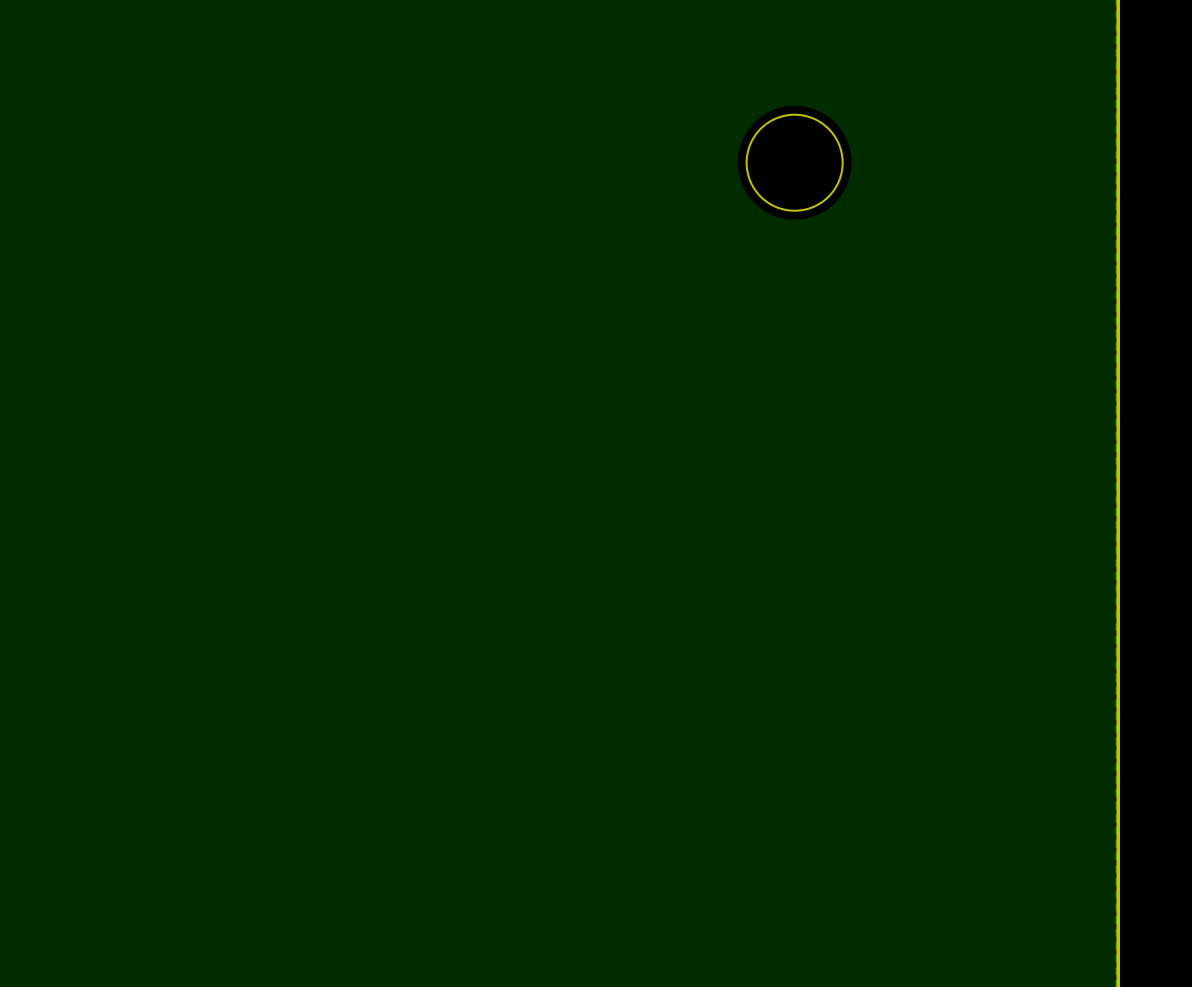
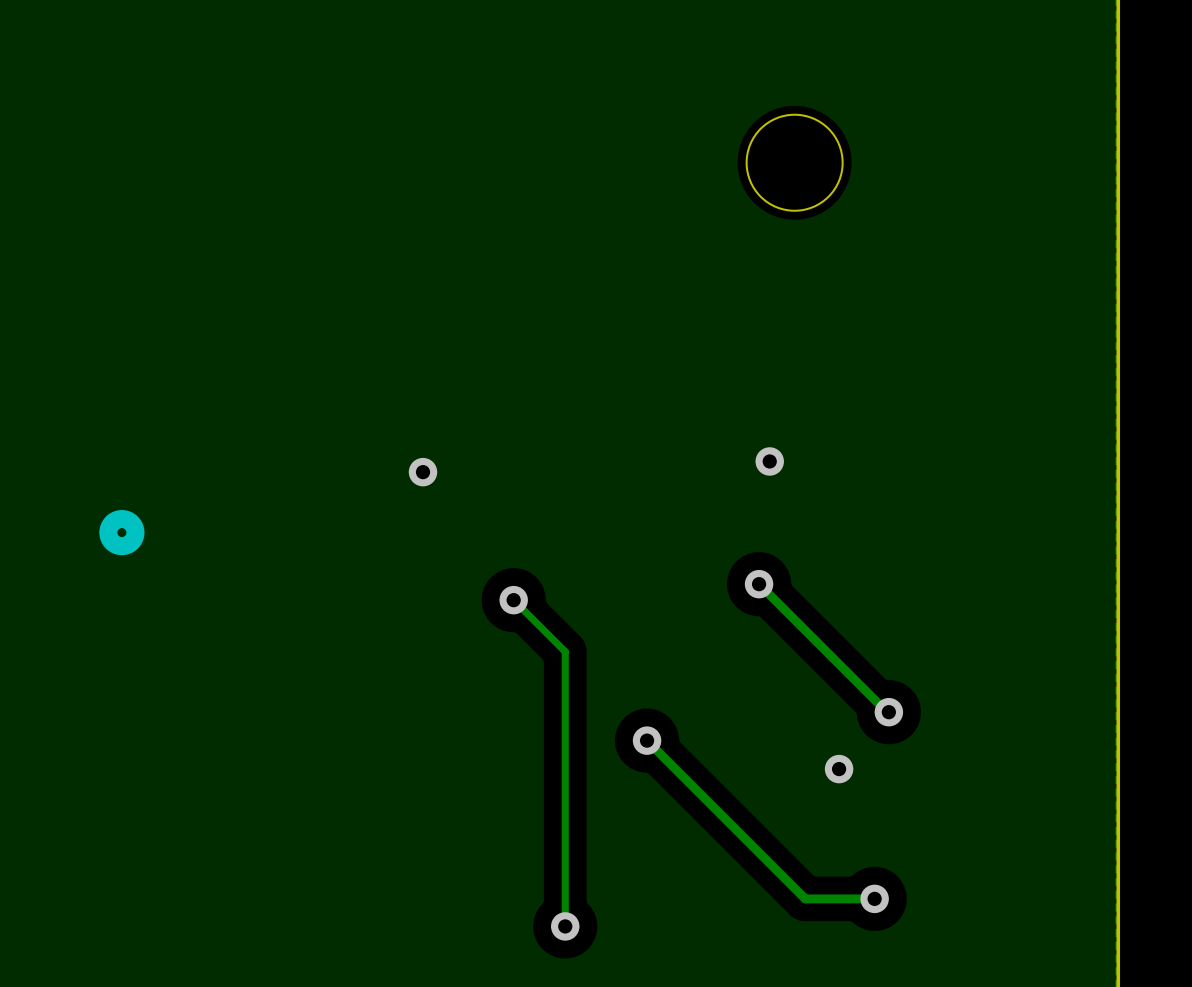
via: none -> (769, 461)
via: none -> (423, 472)
part: none -> (121, 532)
track: none -> (759, 584) (888, 712)
via: none -> (759, 584)
track: none -> (513, 600) (565, 651) (565, 926)
via: none -> (513, 600)
via: none -> (888, 712)
track: none -> (647, 740) (805, 898) (874, 898)
via: none -> (647, 740)
via: none -> (839, 769)
via: none -> (874, 898)
via: none -> (565, 926)

